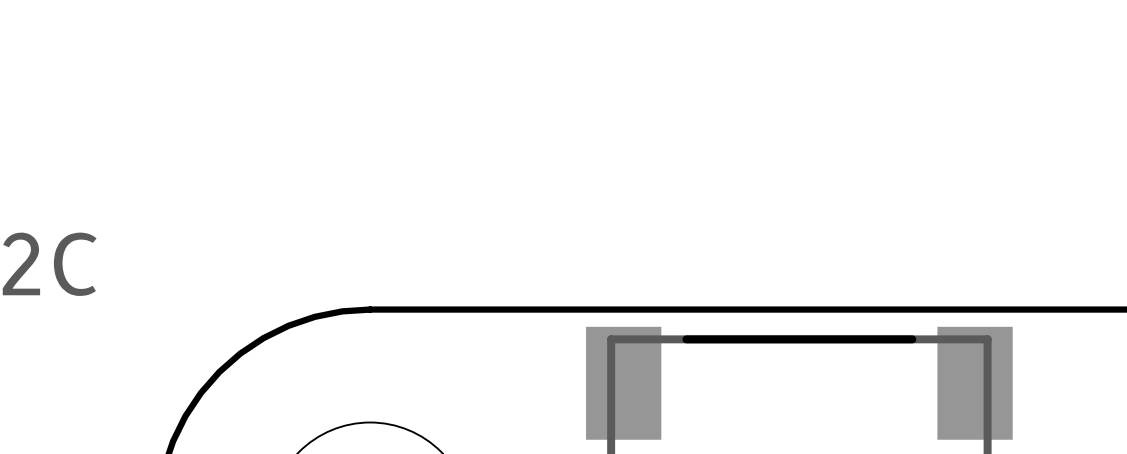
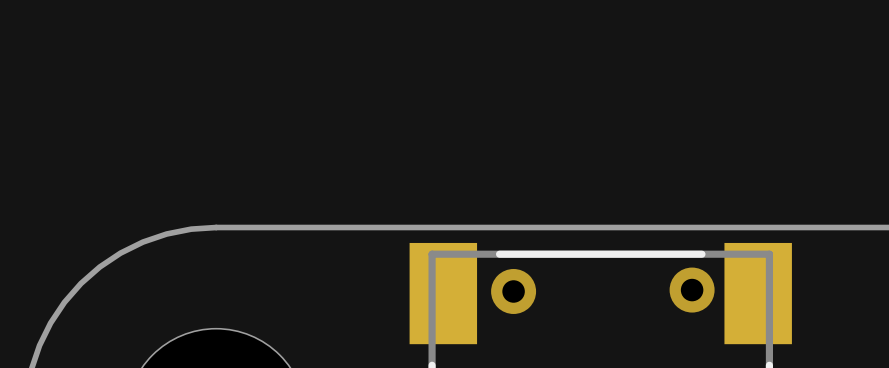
via: none -> (692, 290)
via: none -> (513, 291)

